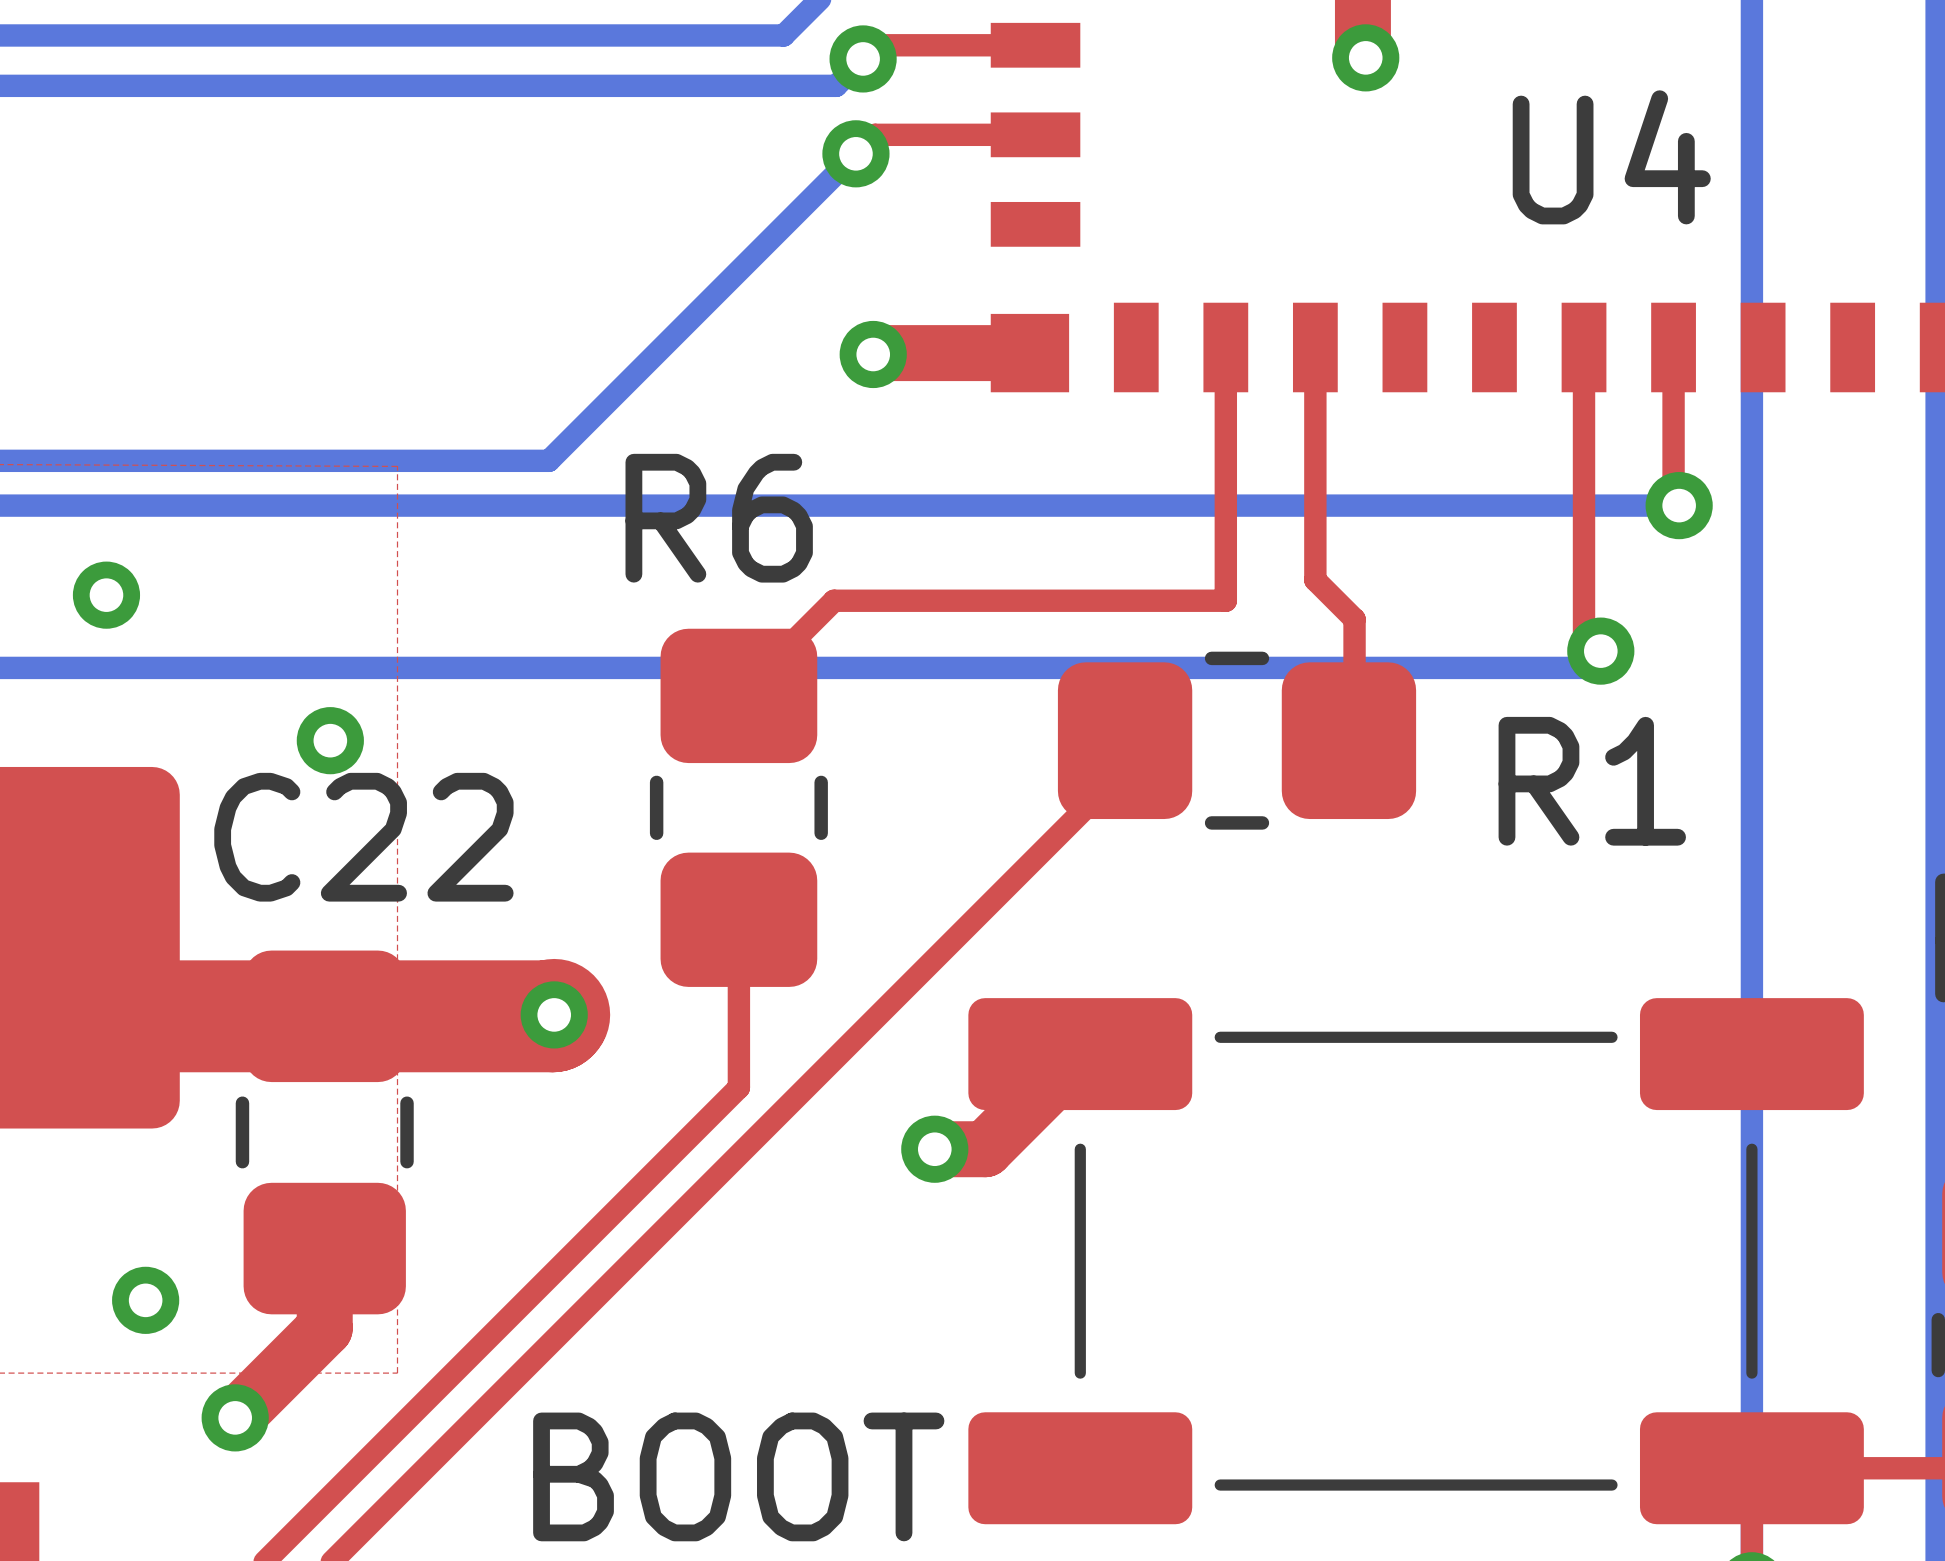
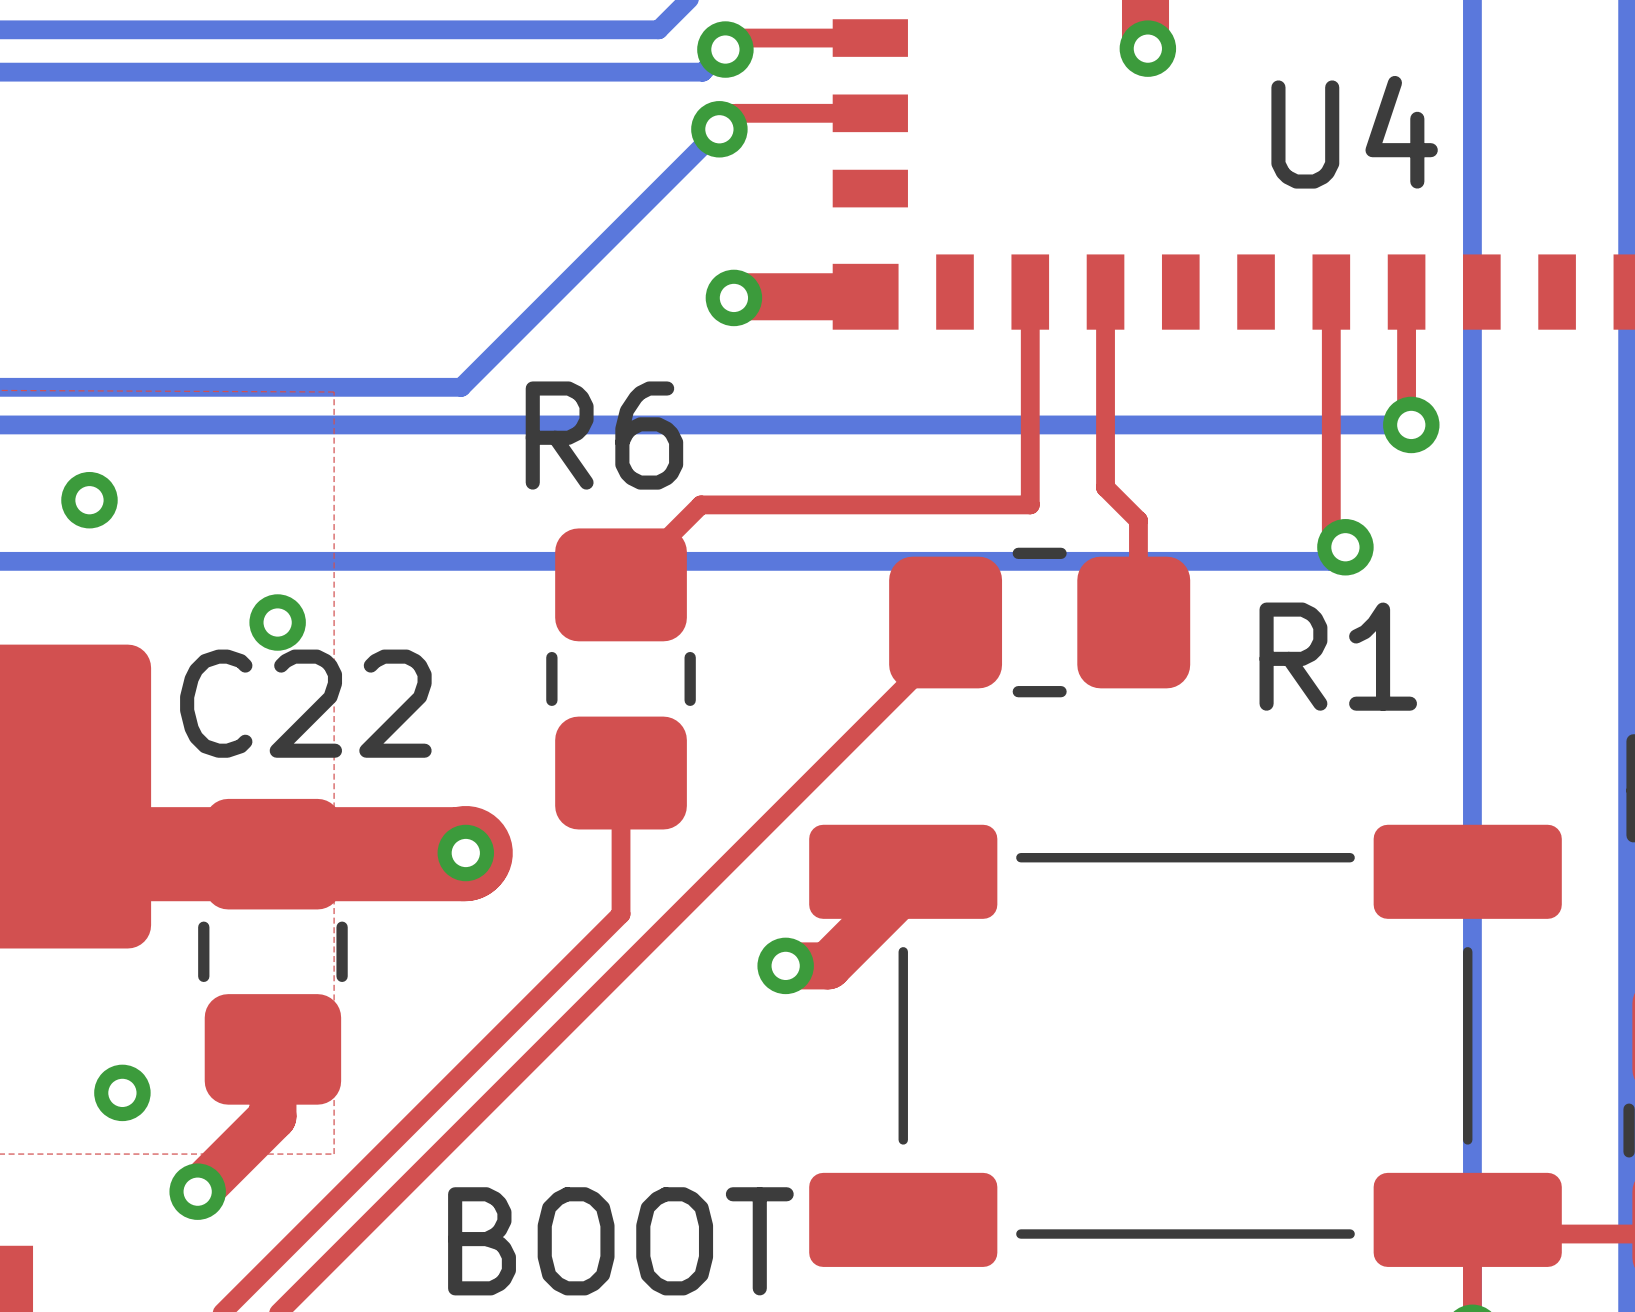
part position: (1416, 1261) -> (1185, 1045)

